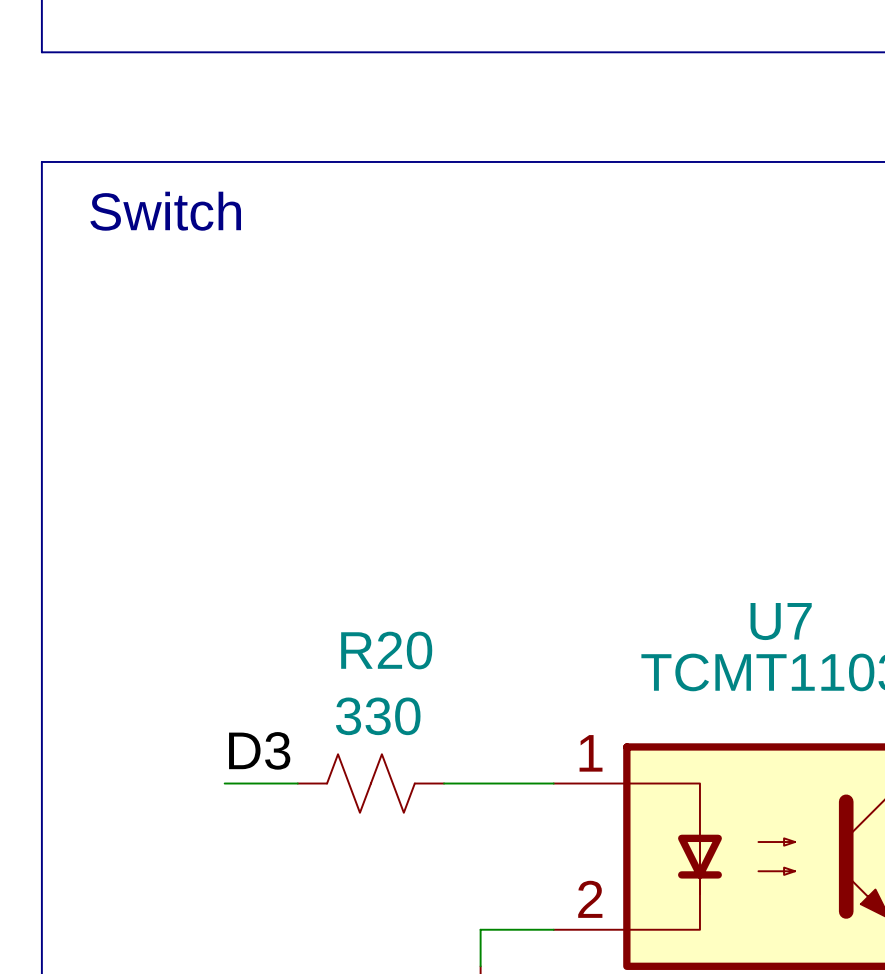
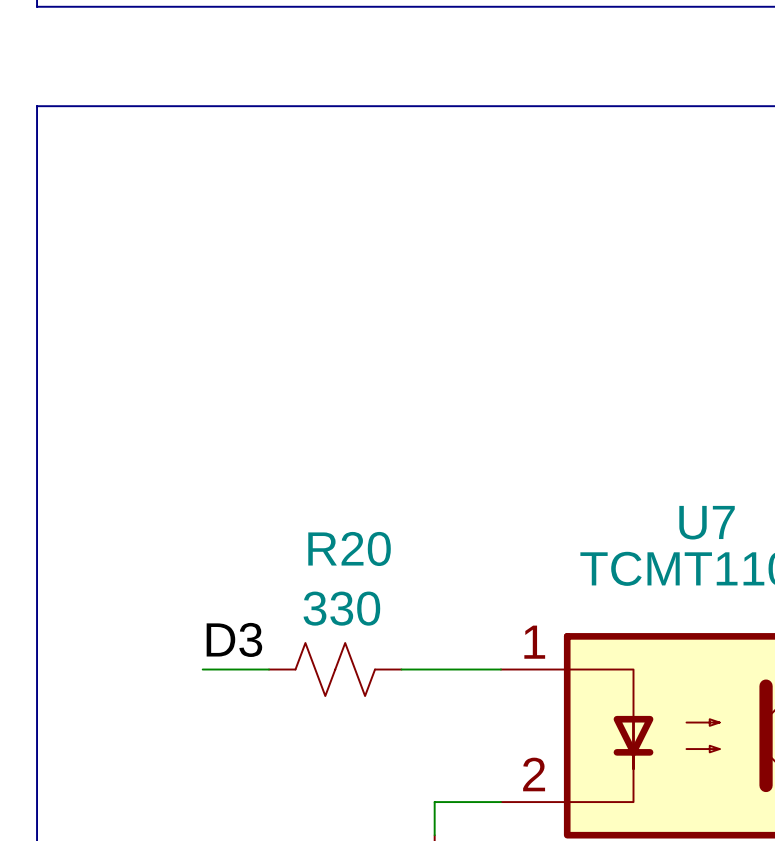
text: Switch (165, 211) -> none

